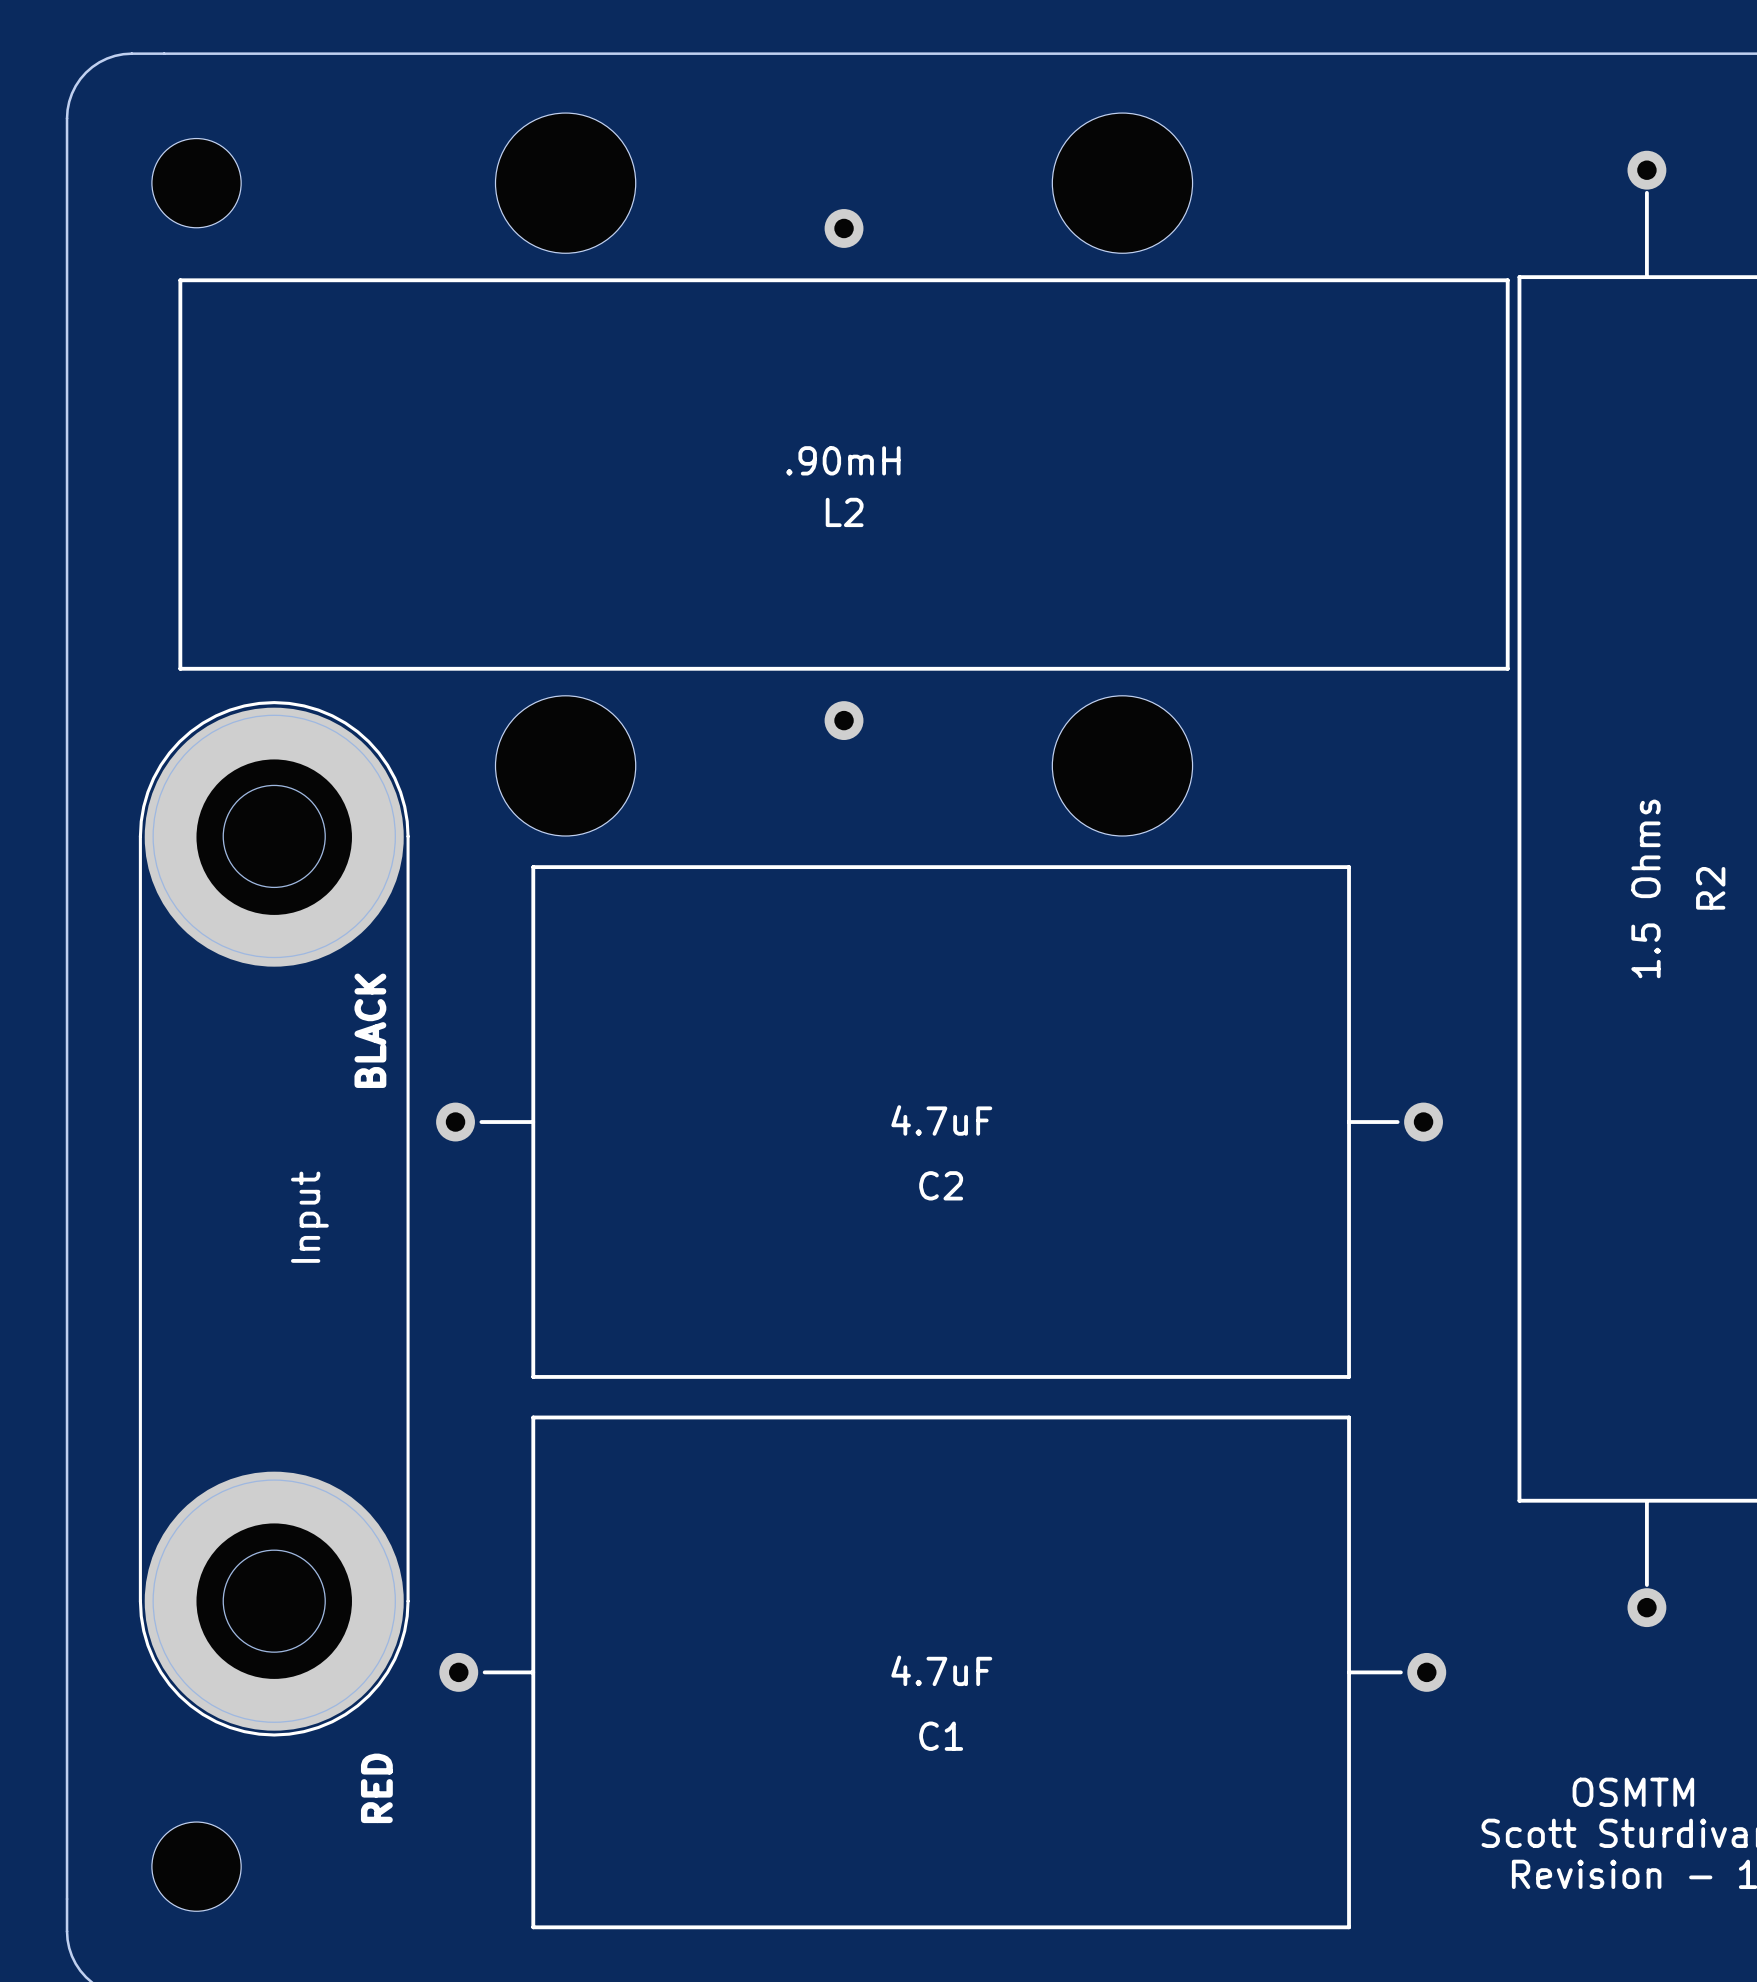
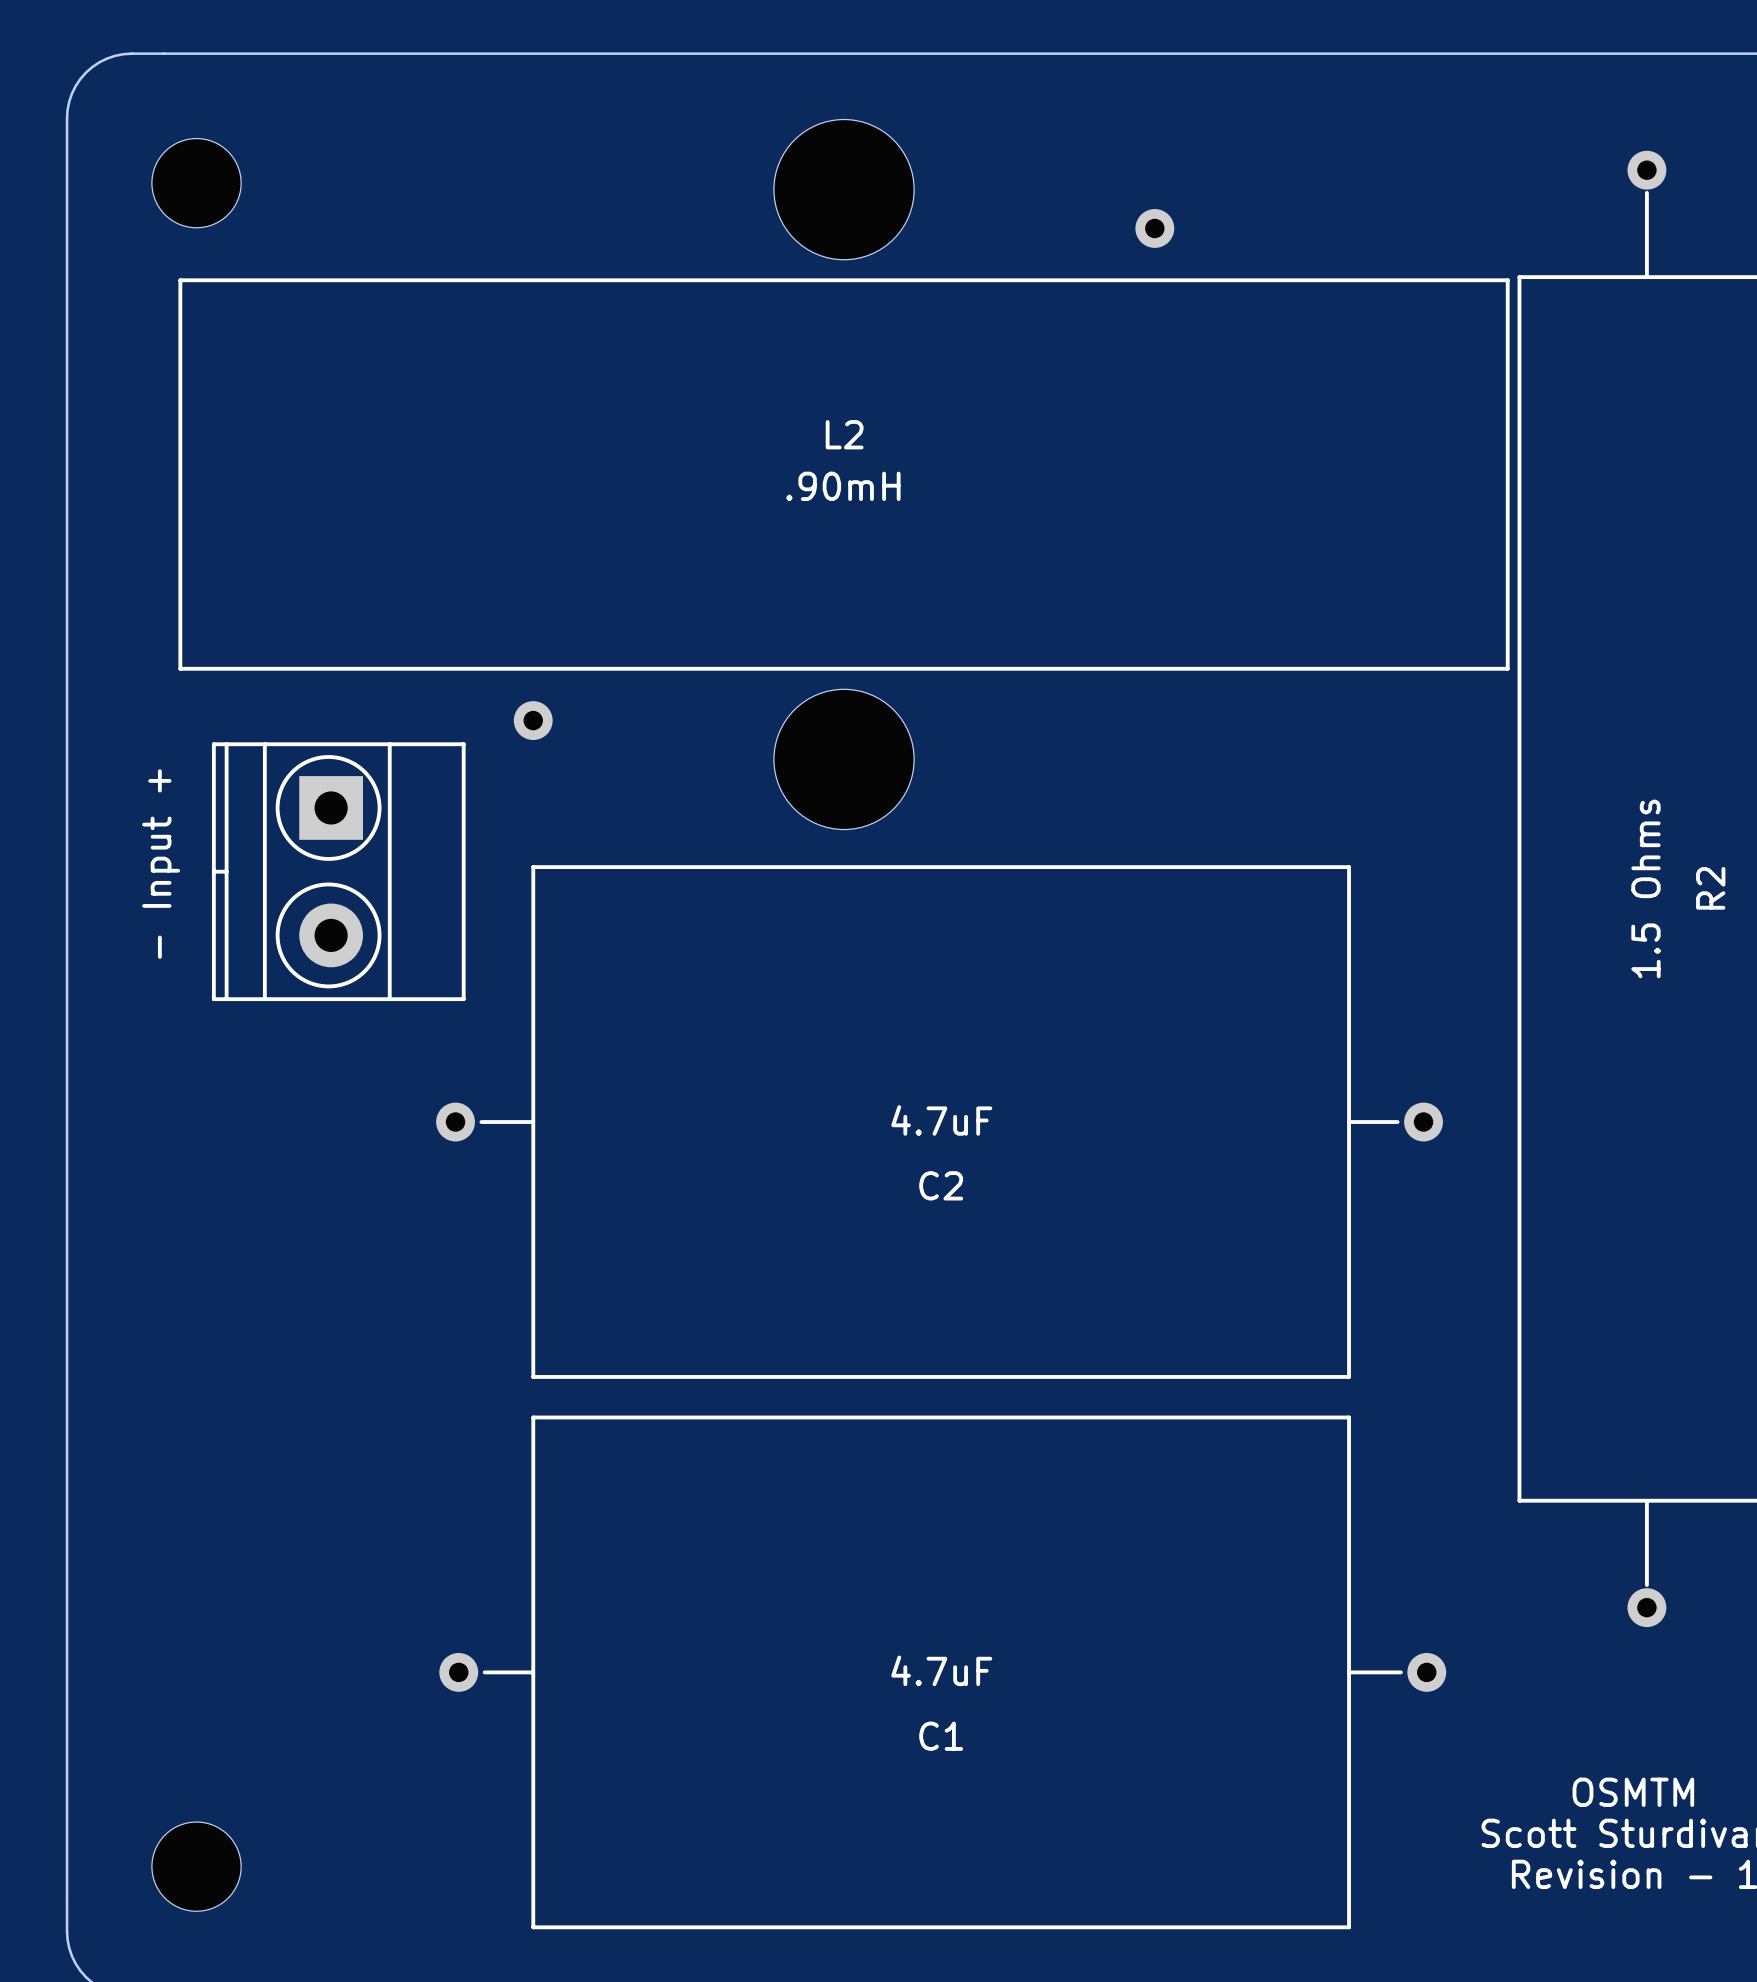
L2 footprint: [178, 113, 1510, 837] -> [178, 119, 1510, 830]
L2 name position: L2 (844, 512) -> L2 (844, 434)
- Input +: none -> (338, 871)
text: BLACK (370, 1030) -> none
Input: (274, 1218) -> none
text: RED (376, 1788) -> none

